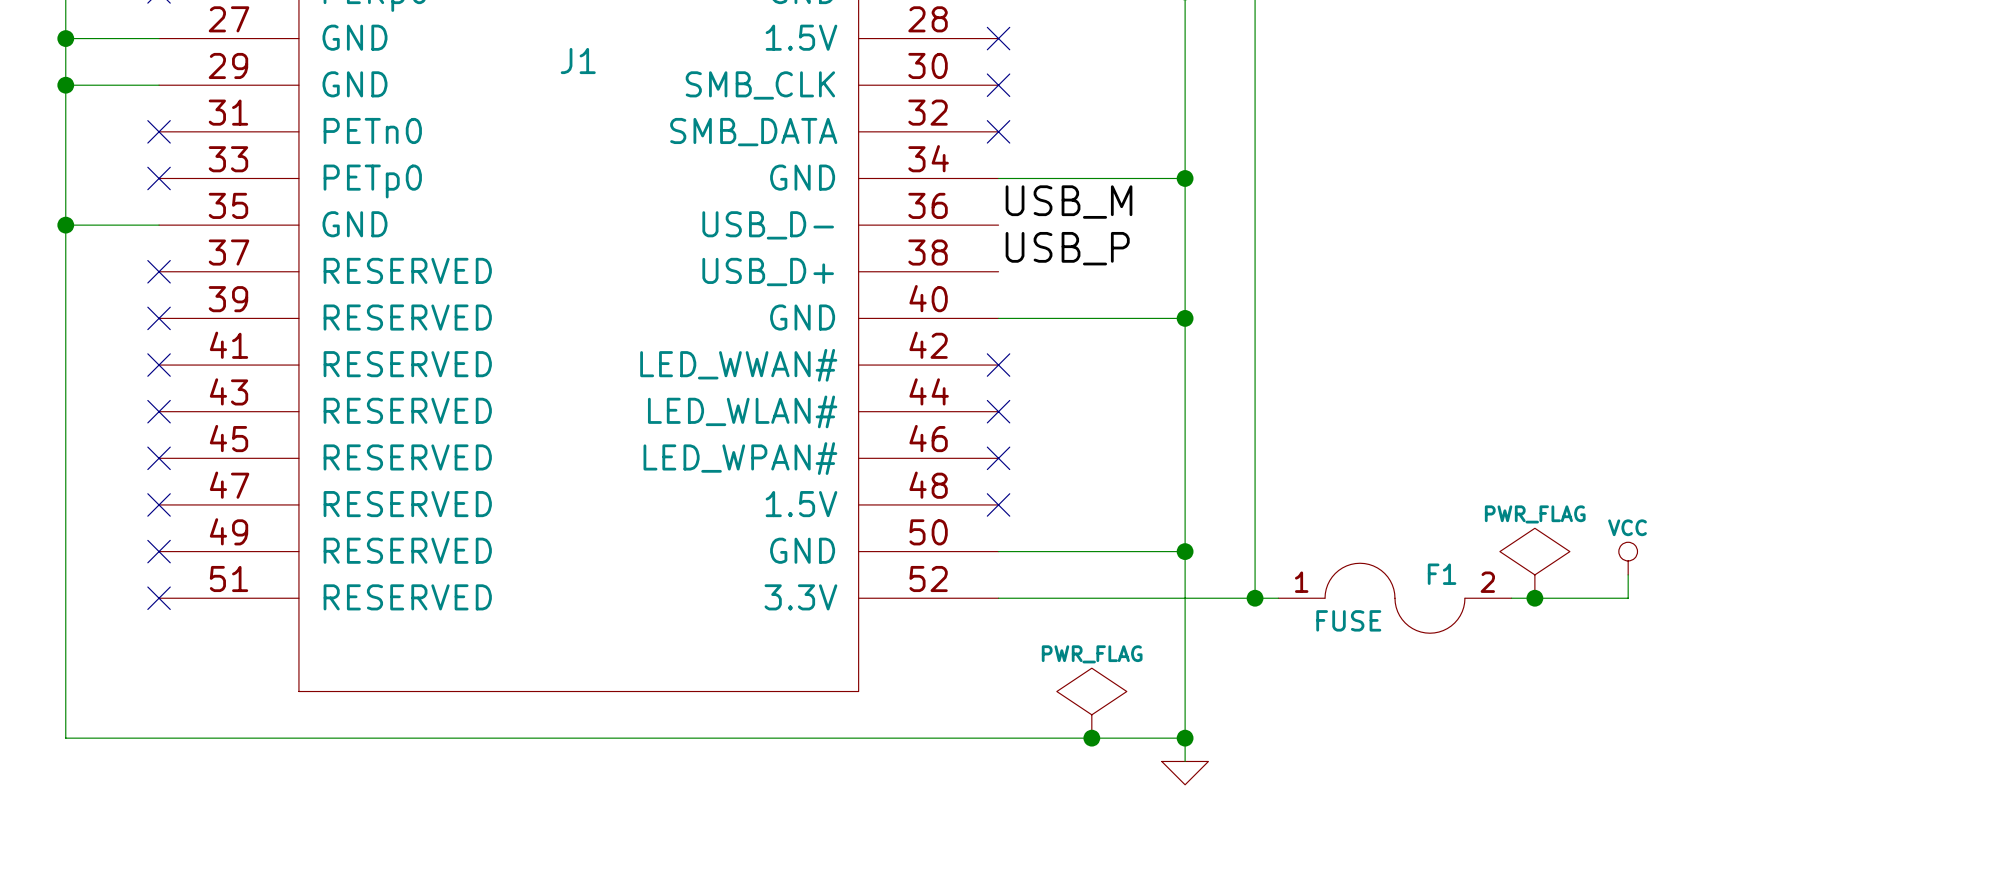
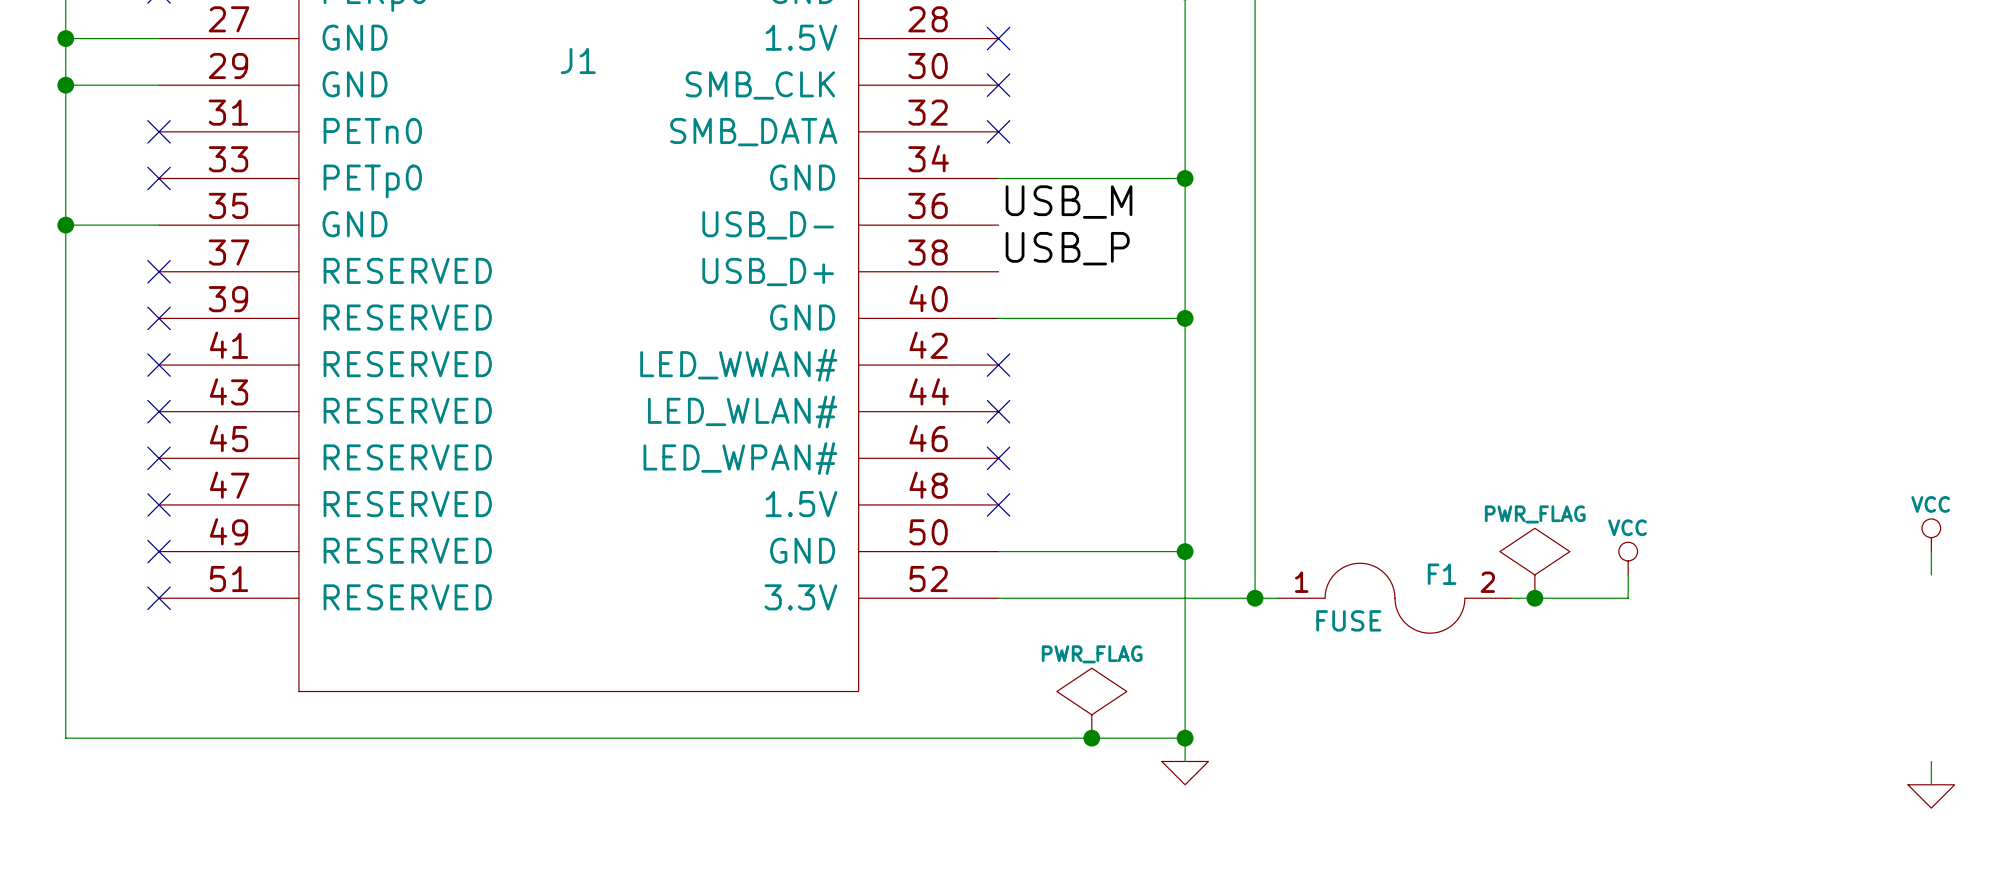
power symbol: none -> VCC (1931, 535)
wire: none -> (1931, 551) (1931, 574)
wire: none -> (1931, 761) (1931, 784)
power symbol: none -> (1931, 796)

